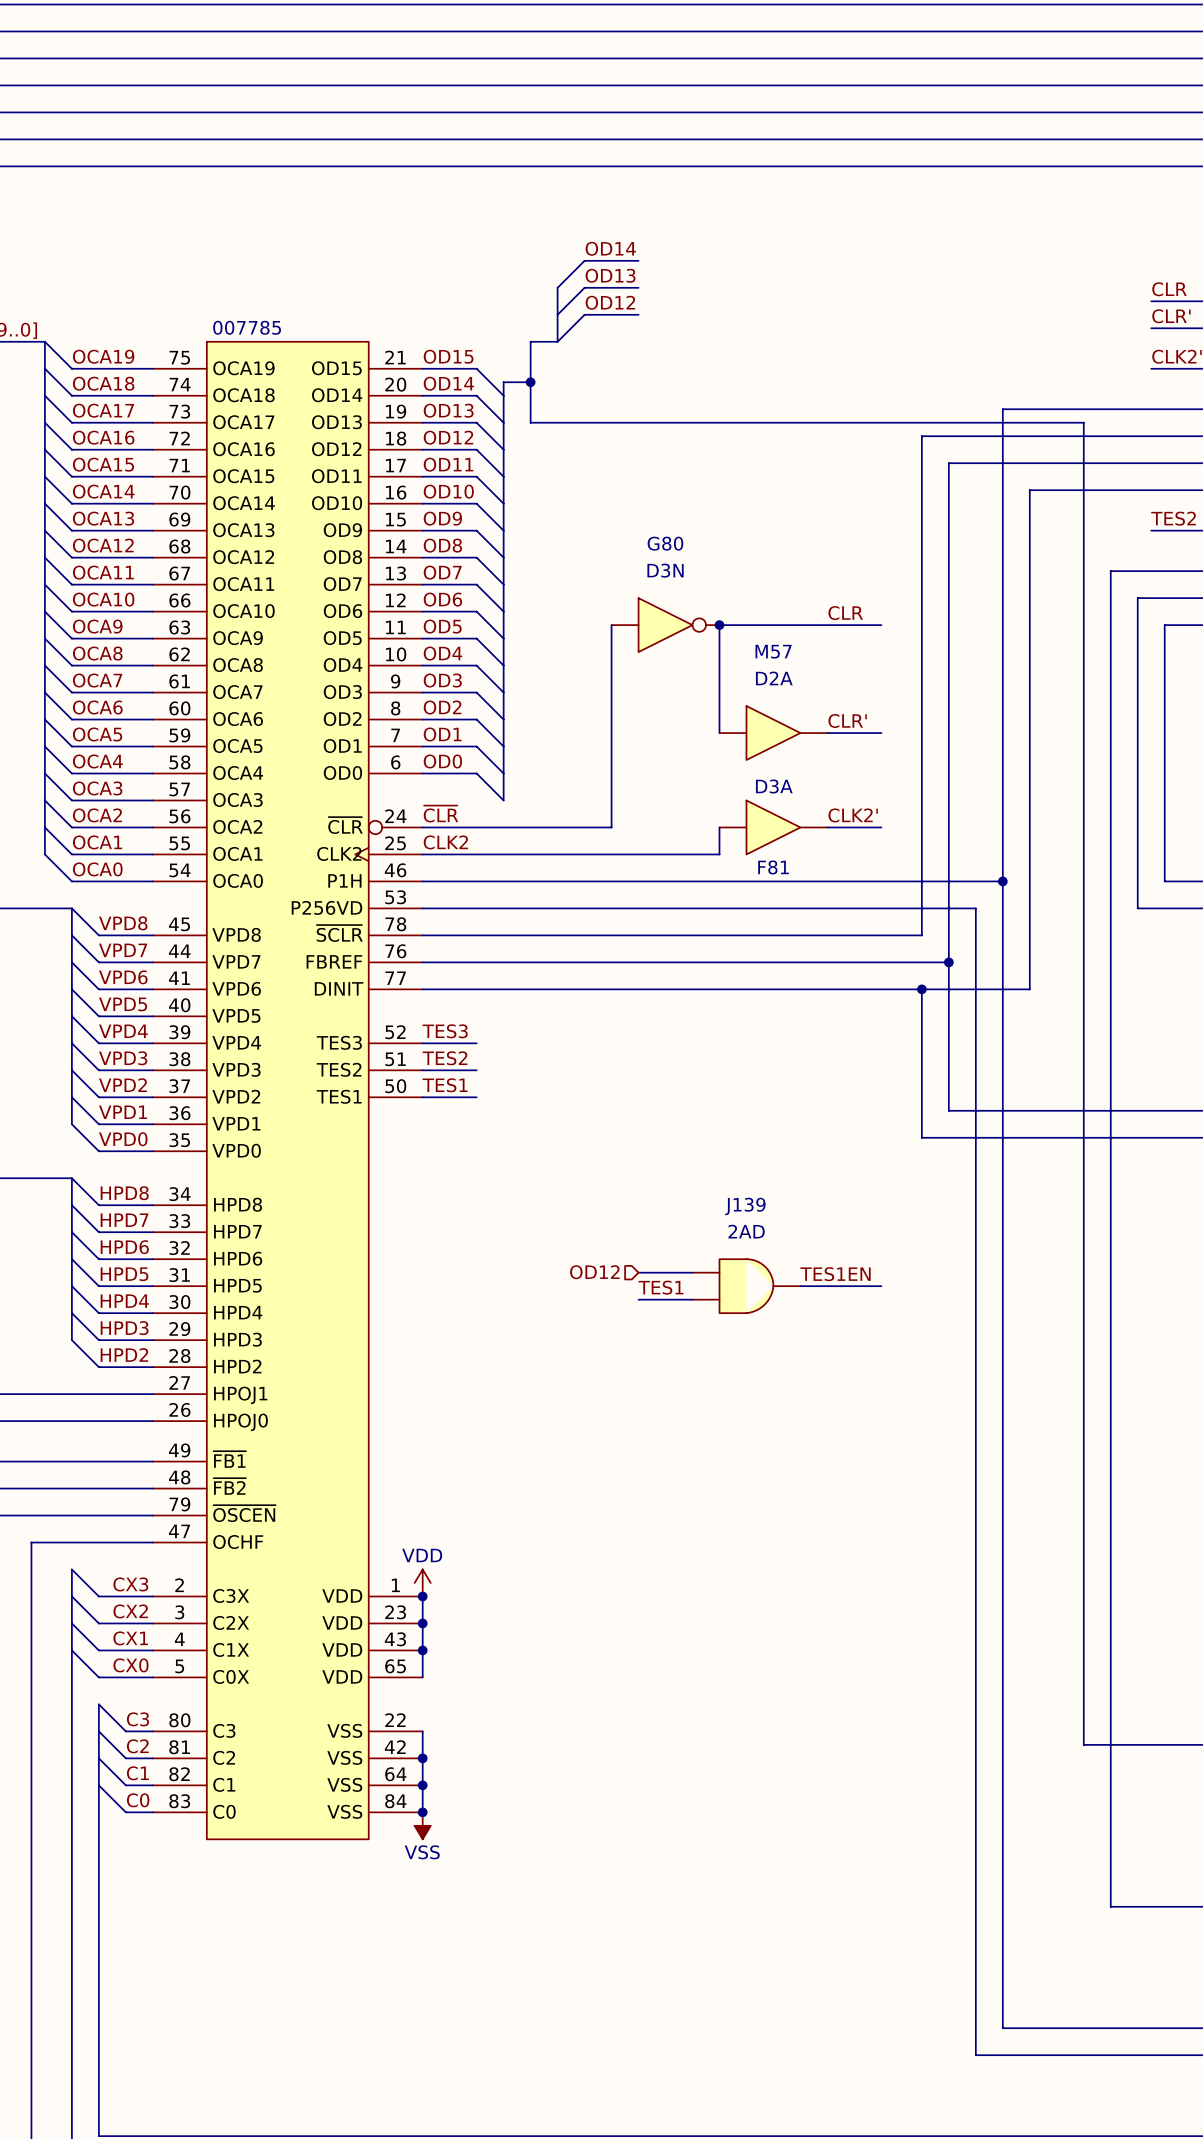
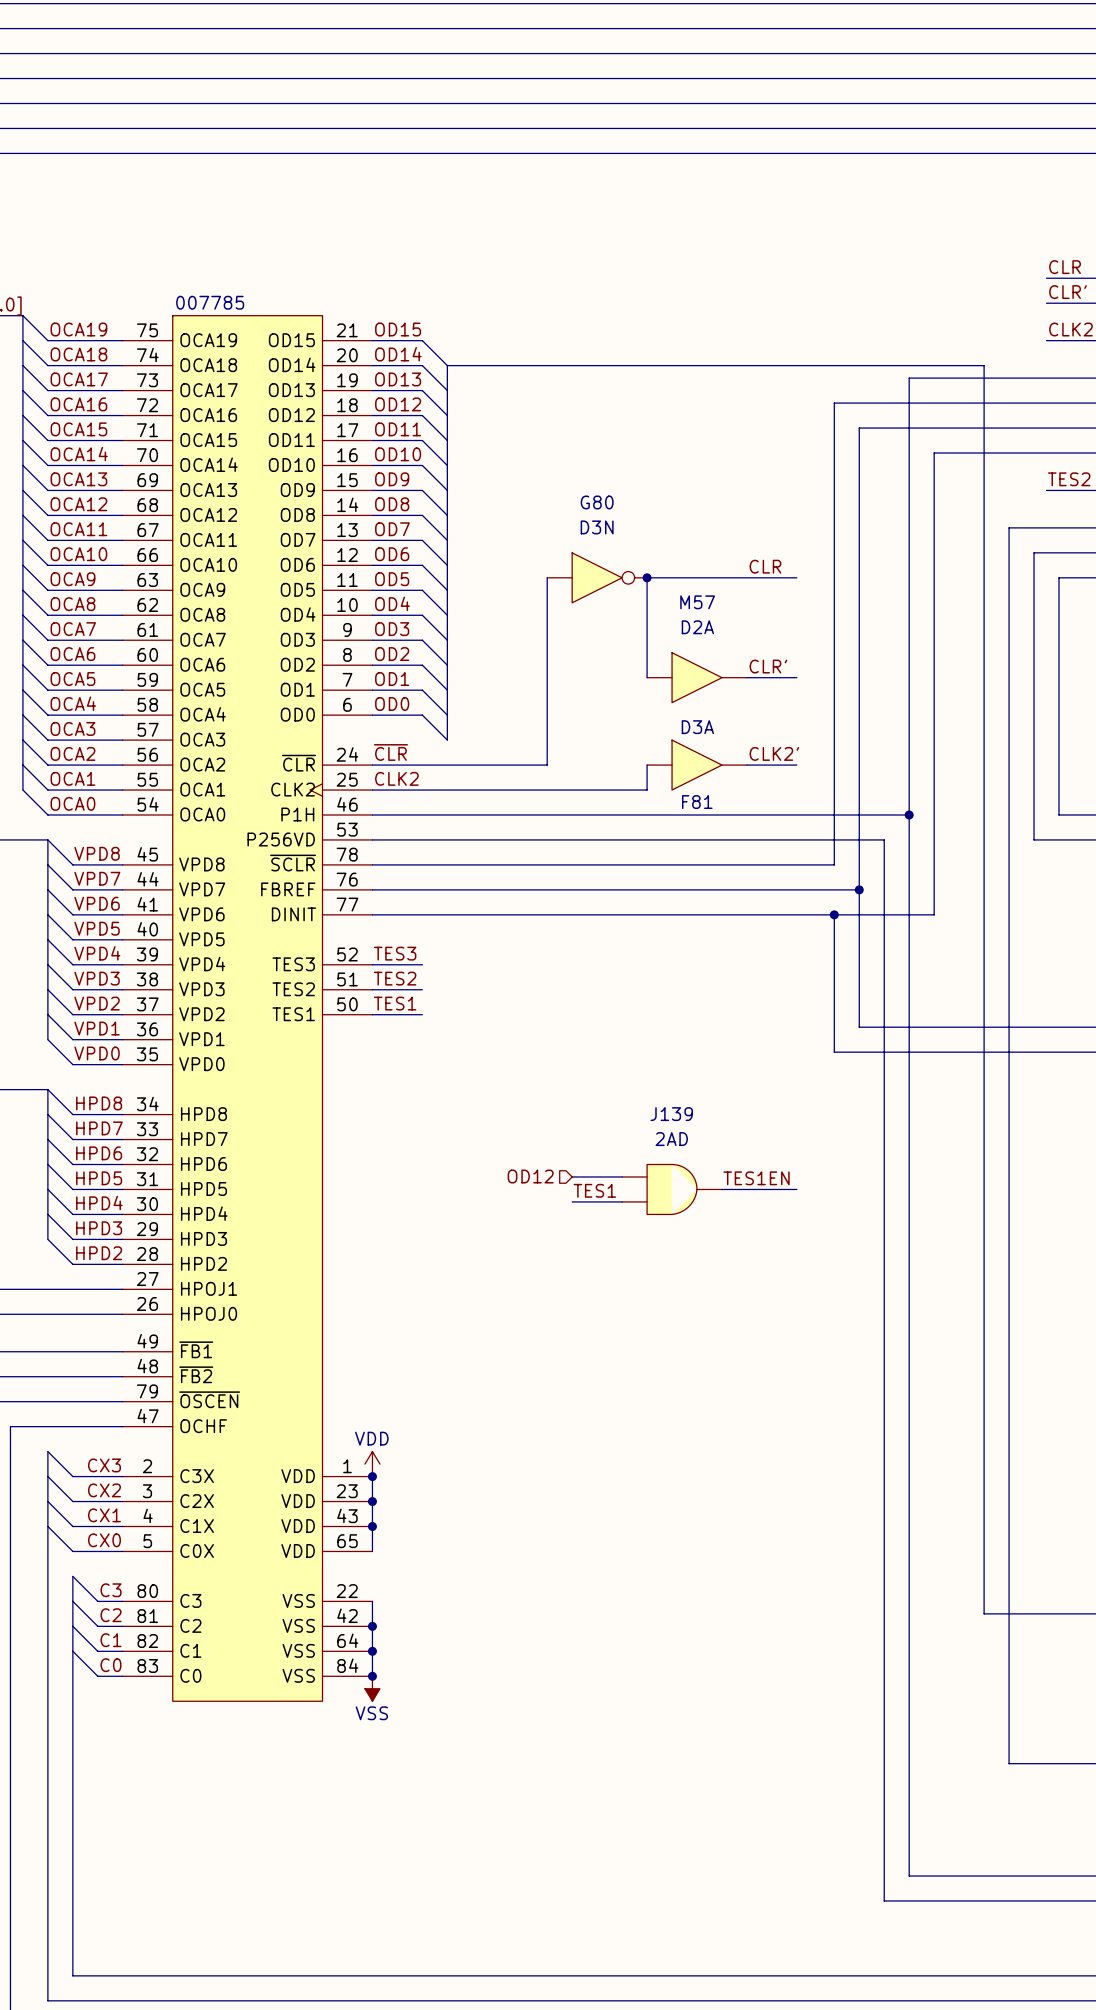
label: OD14 (610, 248) -> none
wire: (638, 260) (584, 260) (557, 287) -> none
label: OD13 (610, 275) -> none
bus: (557, 287) (557, 341) (530, 341) (530, 422) (1083, 422) -> (447, 365) (984, 365) (984, 390)
wire: (638, 287) (584, 287) (557, 314) -> none
label: OD12 (610, 302) -> none
wire: (638, 314) (584, 314) (557, 341) -> none
part symbol: [152, 341, 423, 1840] -> [122, 315, 373, 1702]
bus: (530, 382) (503, 382) (503, 395) -> none
junction: (530, 382) -> none

